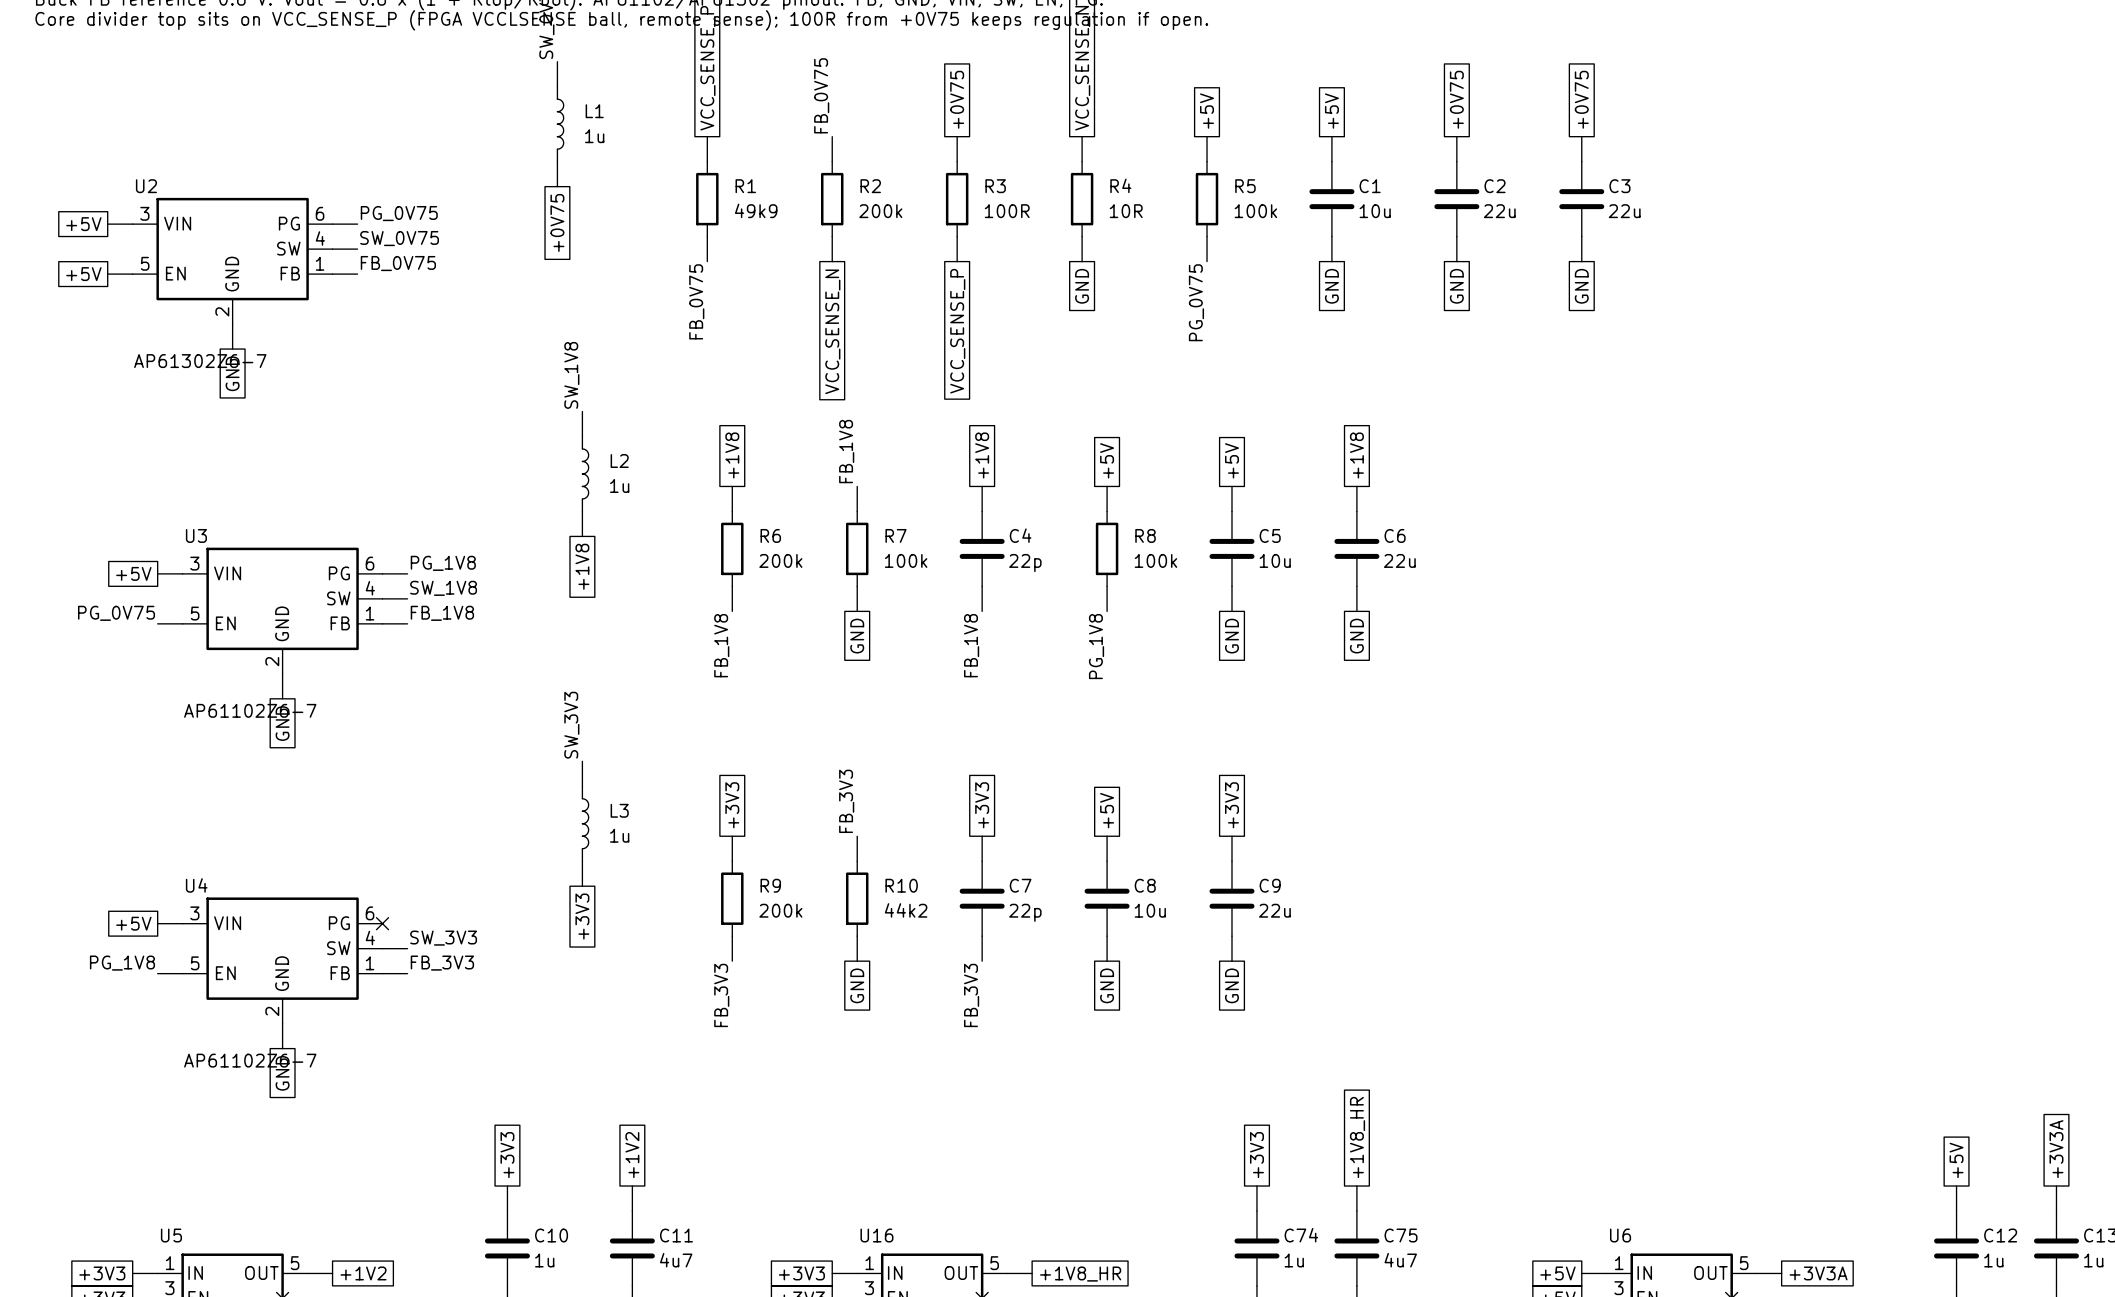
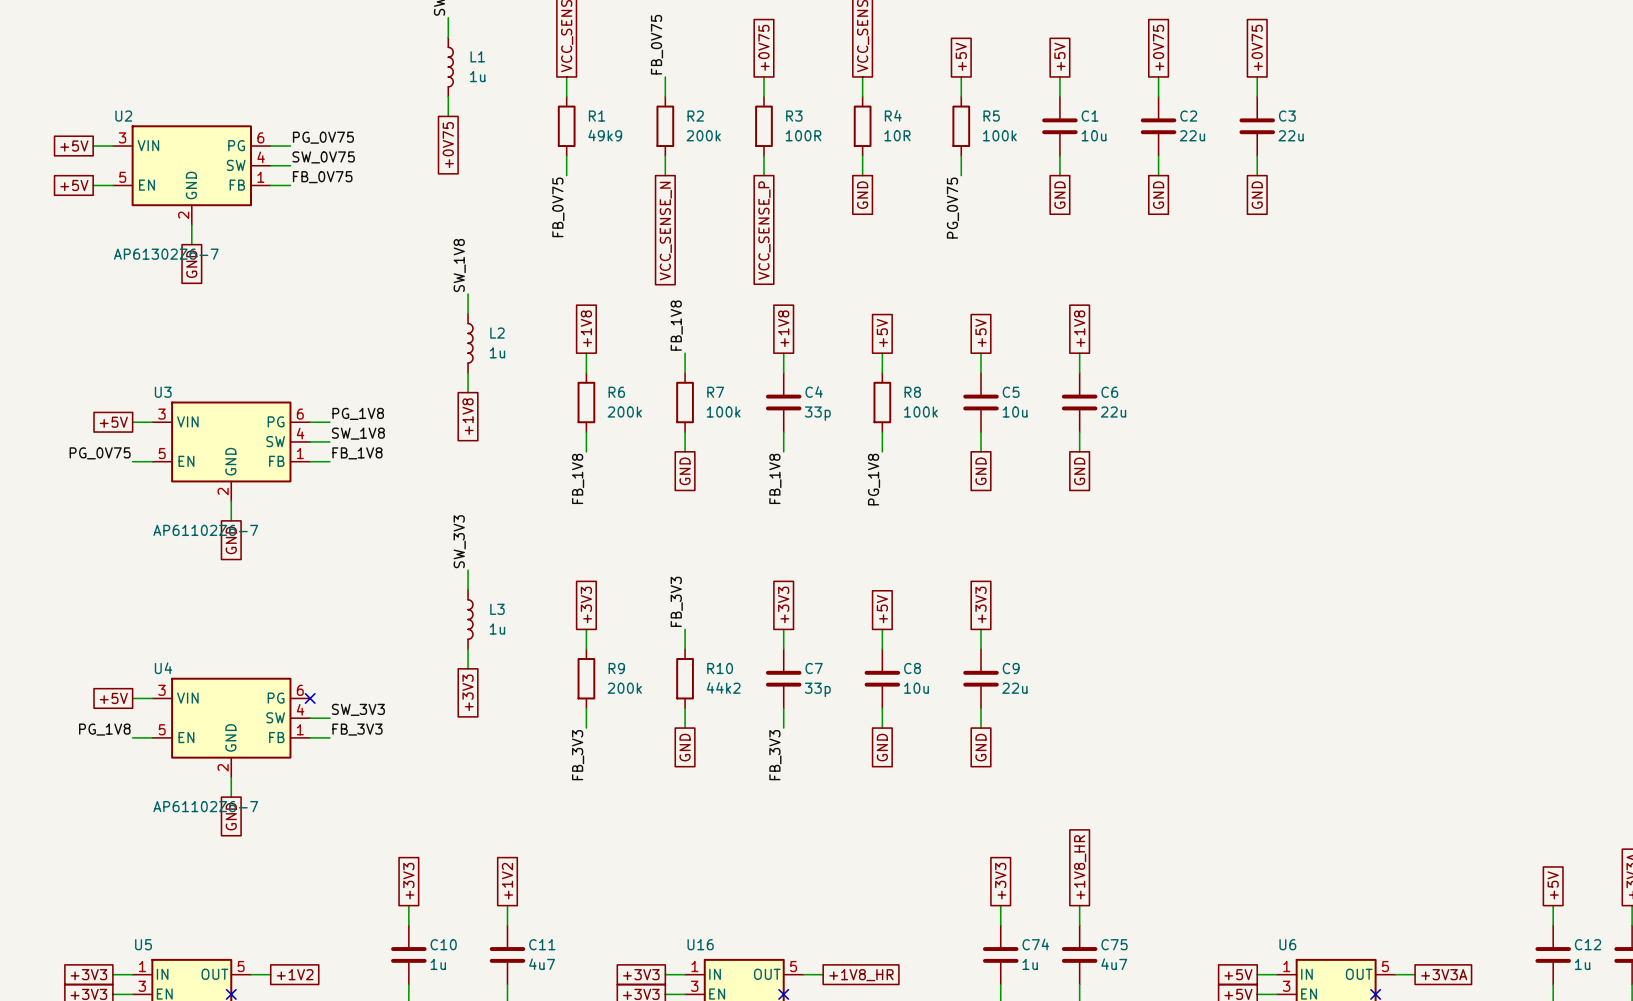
C4 value: 22p (1025, 563) -> 33p (817, 413)
C7 value: 22p (1025, 912) -> 33p (817, 689)

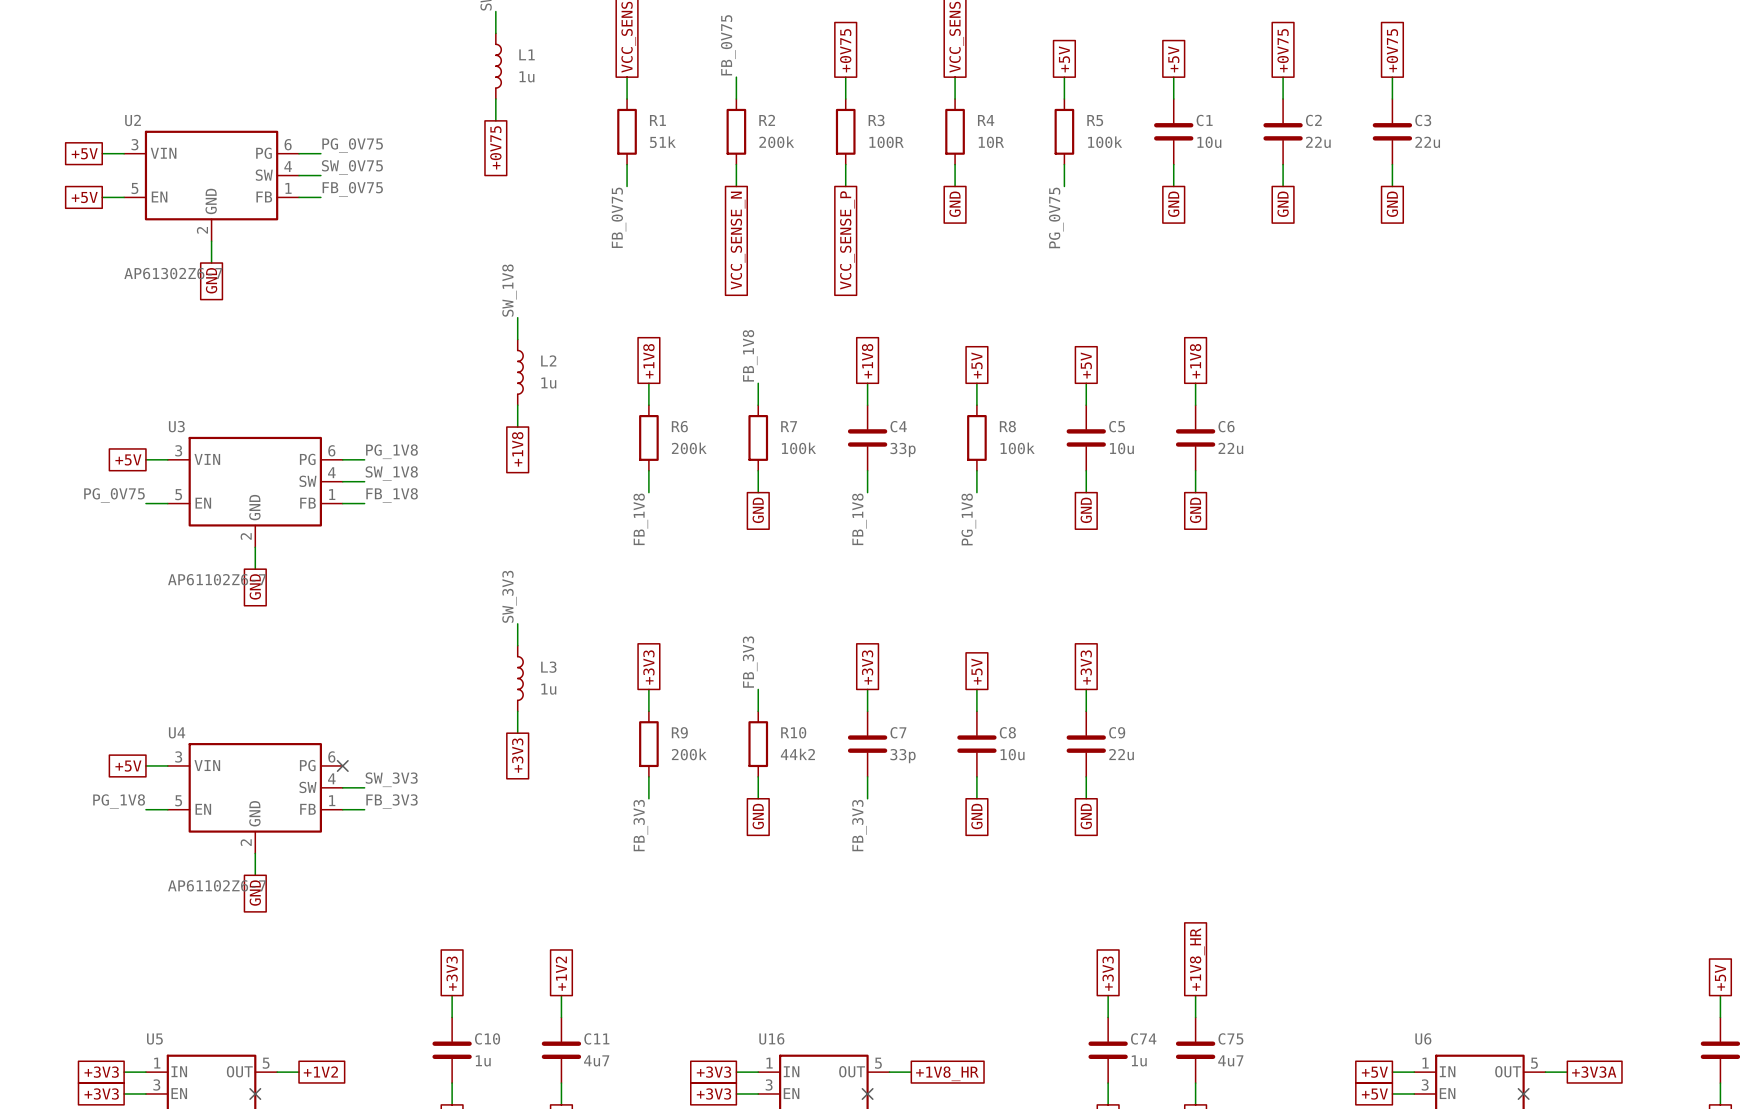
R1 value: 49k9 (605, 135) -> 51k (662, 142)

